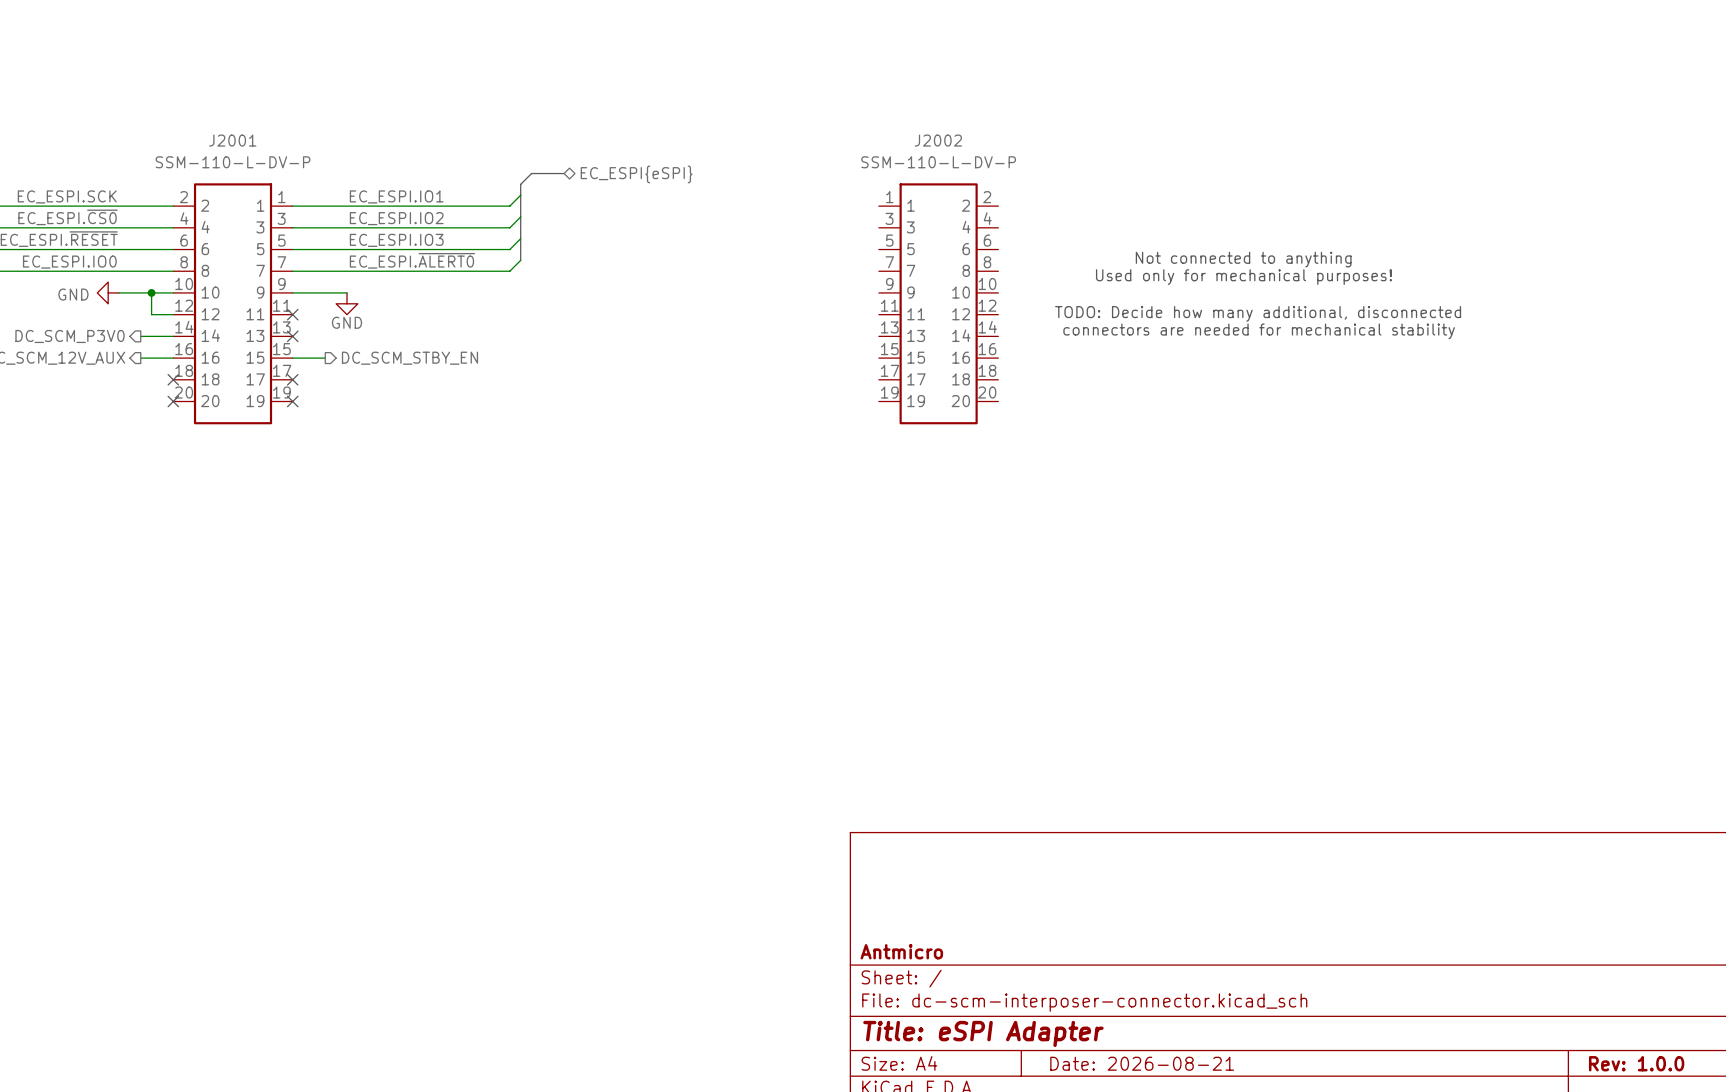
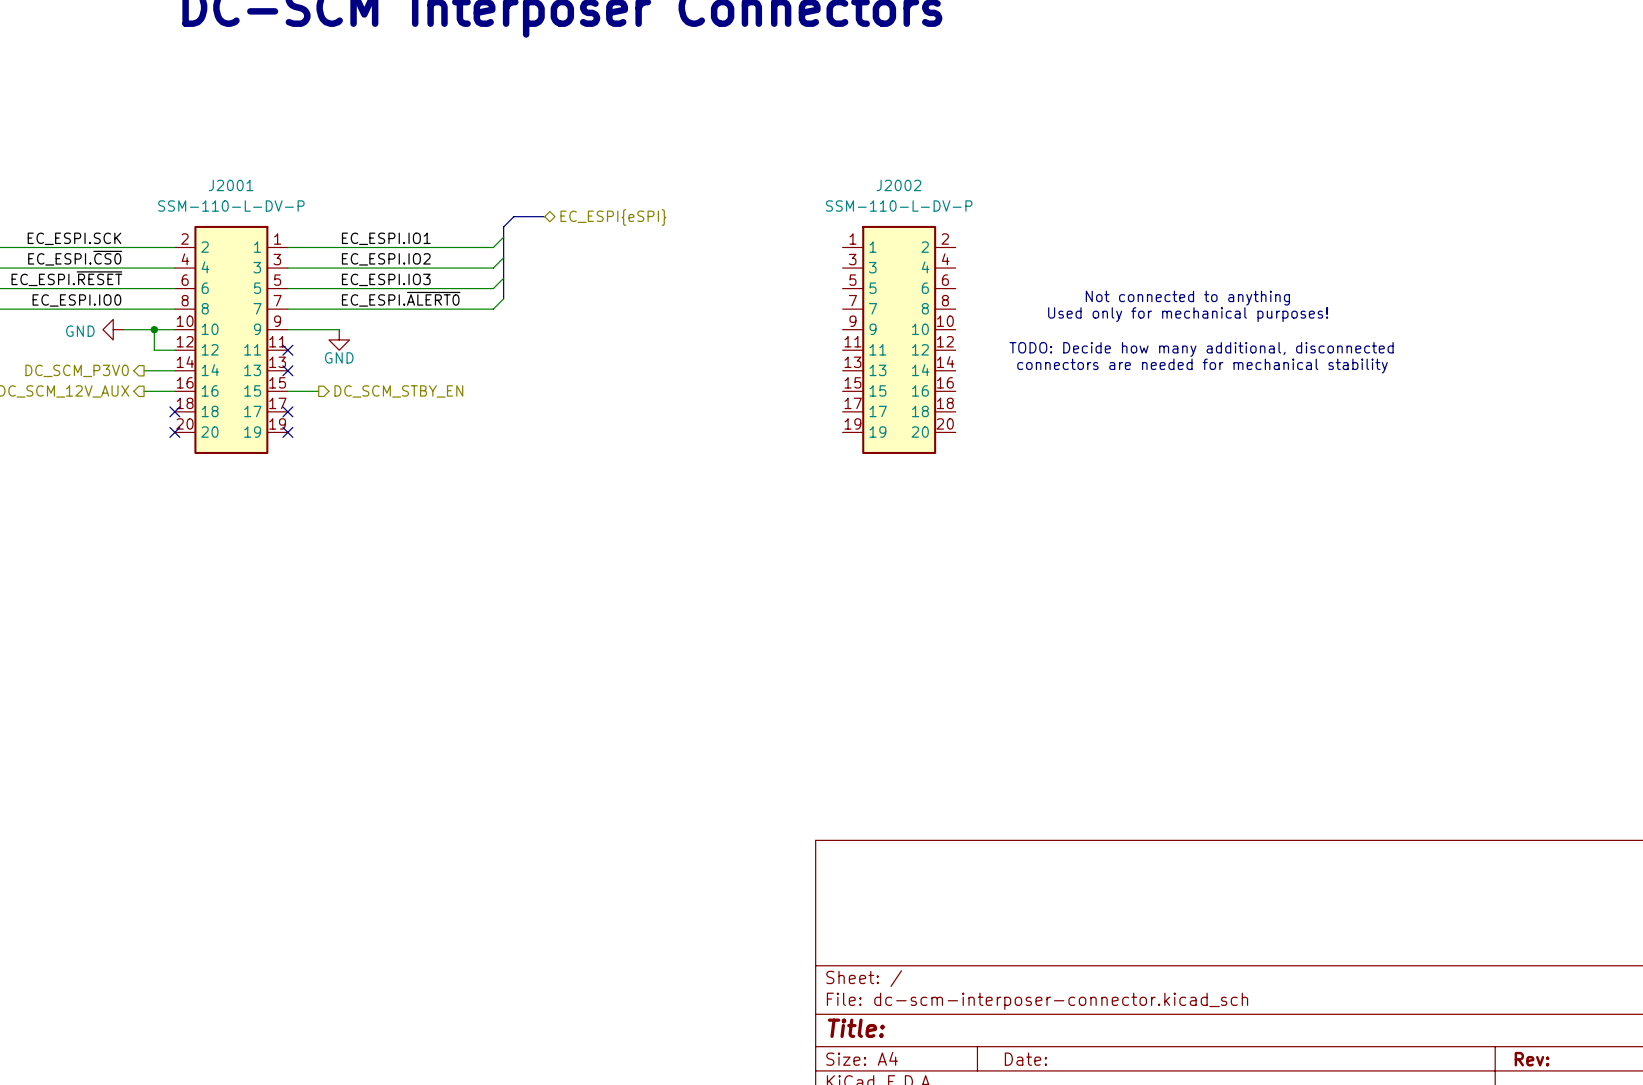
title block: Antmicro (901, 951) -> none
title block: Title: eSPI Adapter (983, 1033) -> Title: (856, 1028)
title block: Date: 2026-08-21 (1142, 1063) -> Date: (1025, 1059)
title block: Rev: 1.0.0 (1636, 1063) -> Rev: (1532, 1059)

